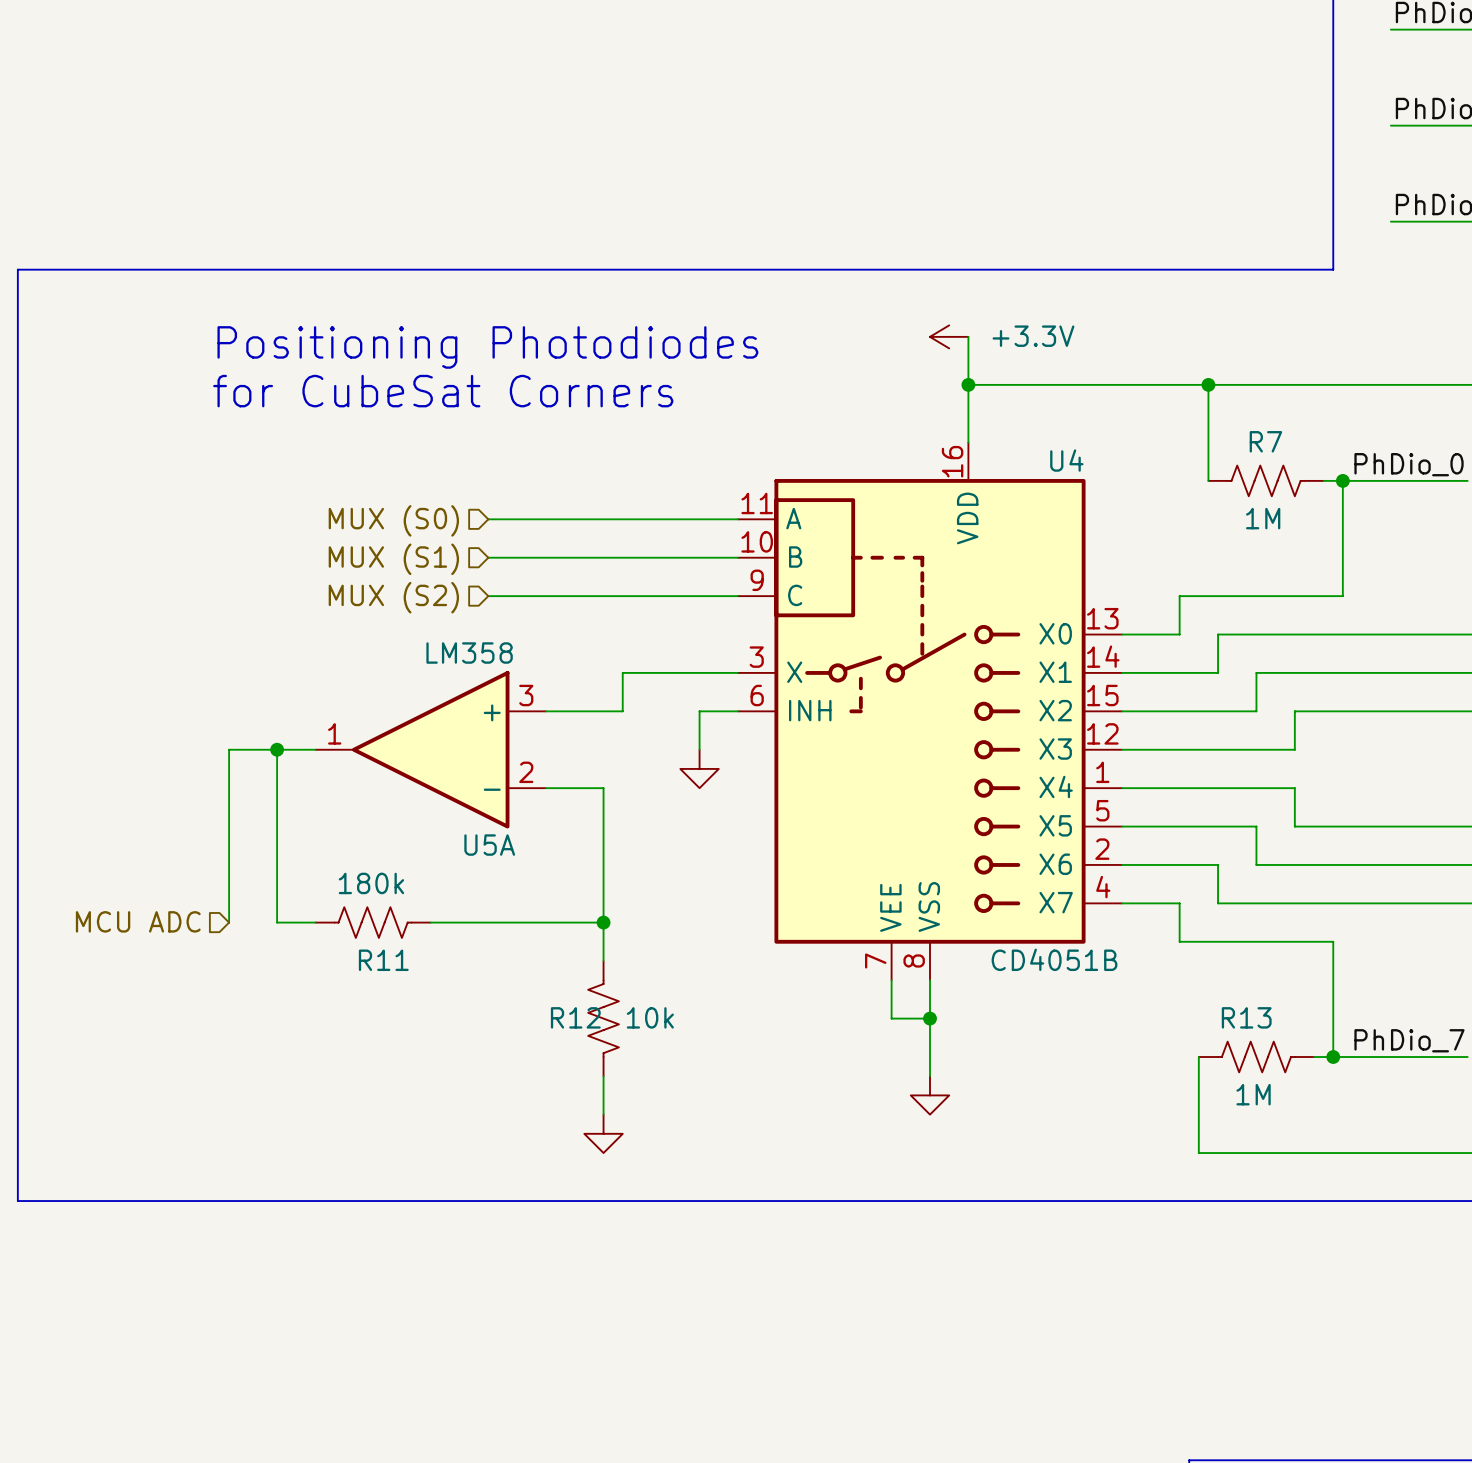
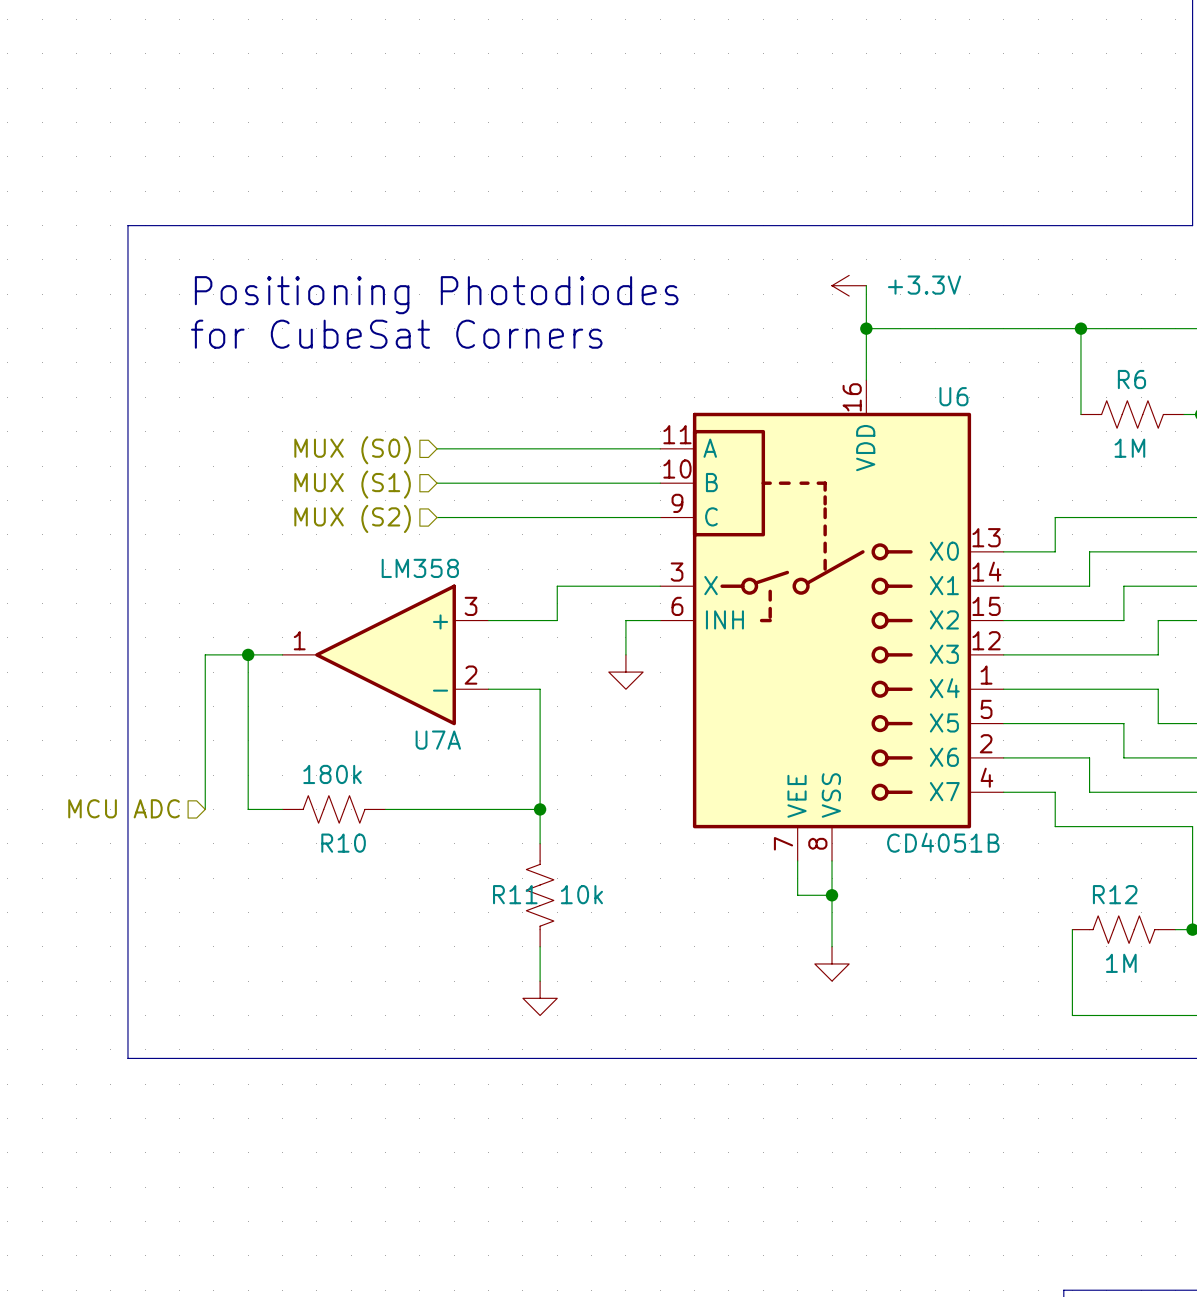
line: (142, 269) (17, 269) (17, 1201) (142, 1201) -> (127, 225) (127, 1058)
R7 name: R7 (1265, 441) -> R6 (1131, 379)
U4 name: U4 (1066, 460) -> U6 (953, 396)
U5A name: U5A (489, 845) -> U7A (438, 740)
R11 name: R11 (383, 960) -> R10 (343, 843)
R12 name: R12 (575, 1017) -> R11 (515, 894)
R13 name: R13 (1246, 1017) -> R12 (1115, 894)

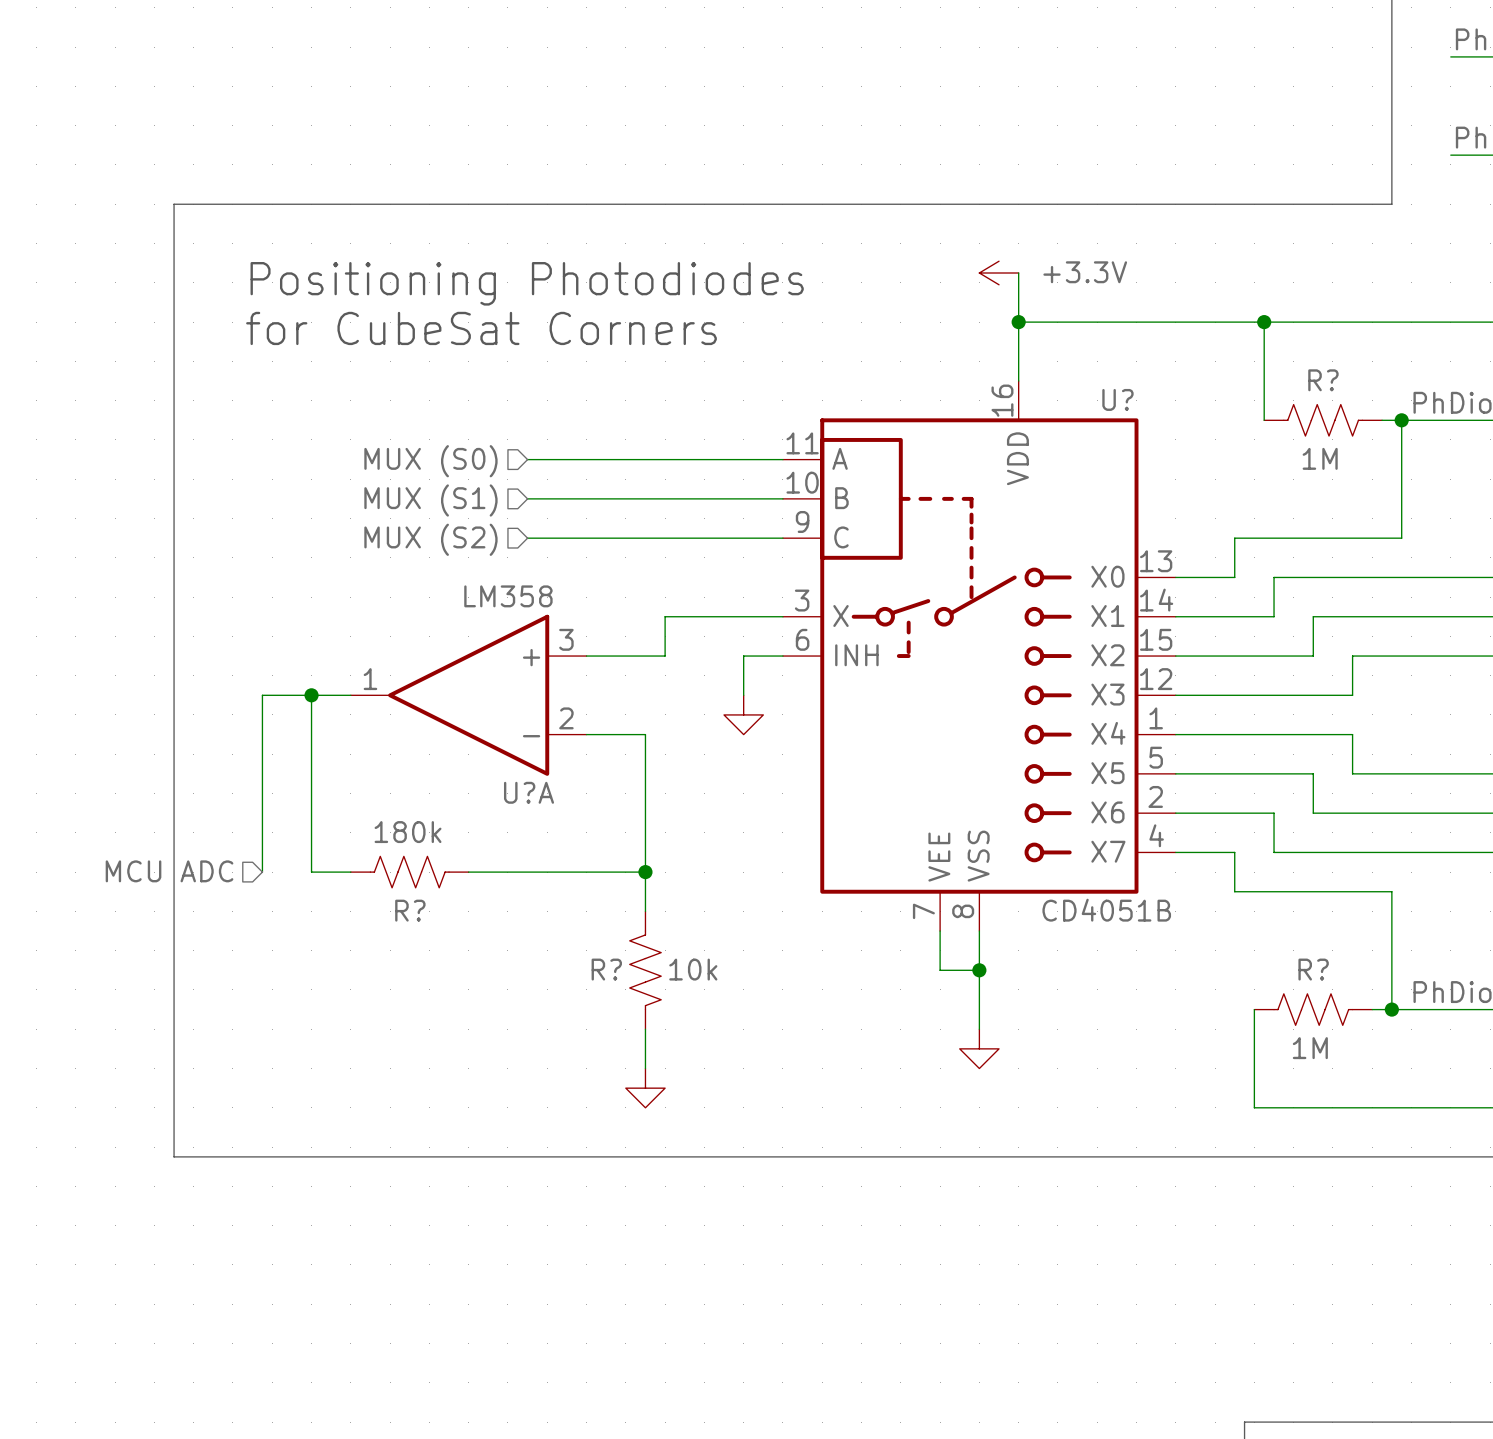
R6 name: R6 (1131, 379) -> R? (1323, 380)
U6 name: U6 (953, 396) -> U? (1117, 399)
U7A name: U7A (438, 740) -> U?A (529, 792)
R10 name: R10 (343, 843) -> R? (410, 910)
R11 name: R11 (515, 894) -> R? (606, 969)
R12 name: R12 (1115, 894) -> R? (1313, 969)

